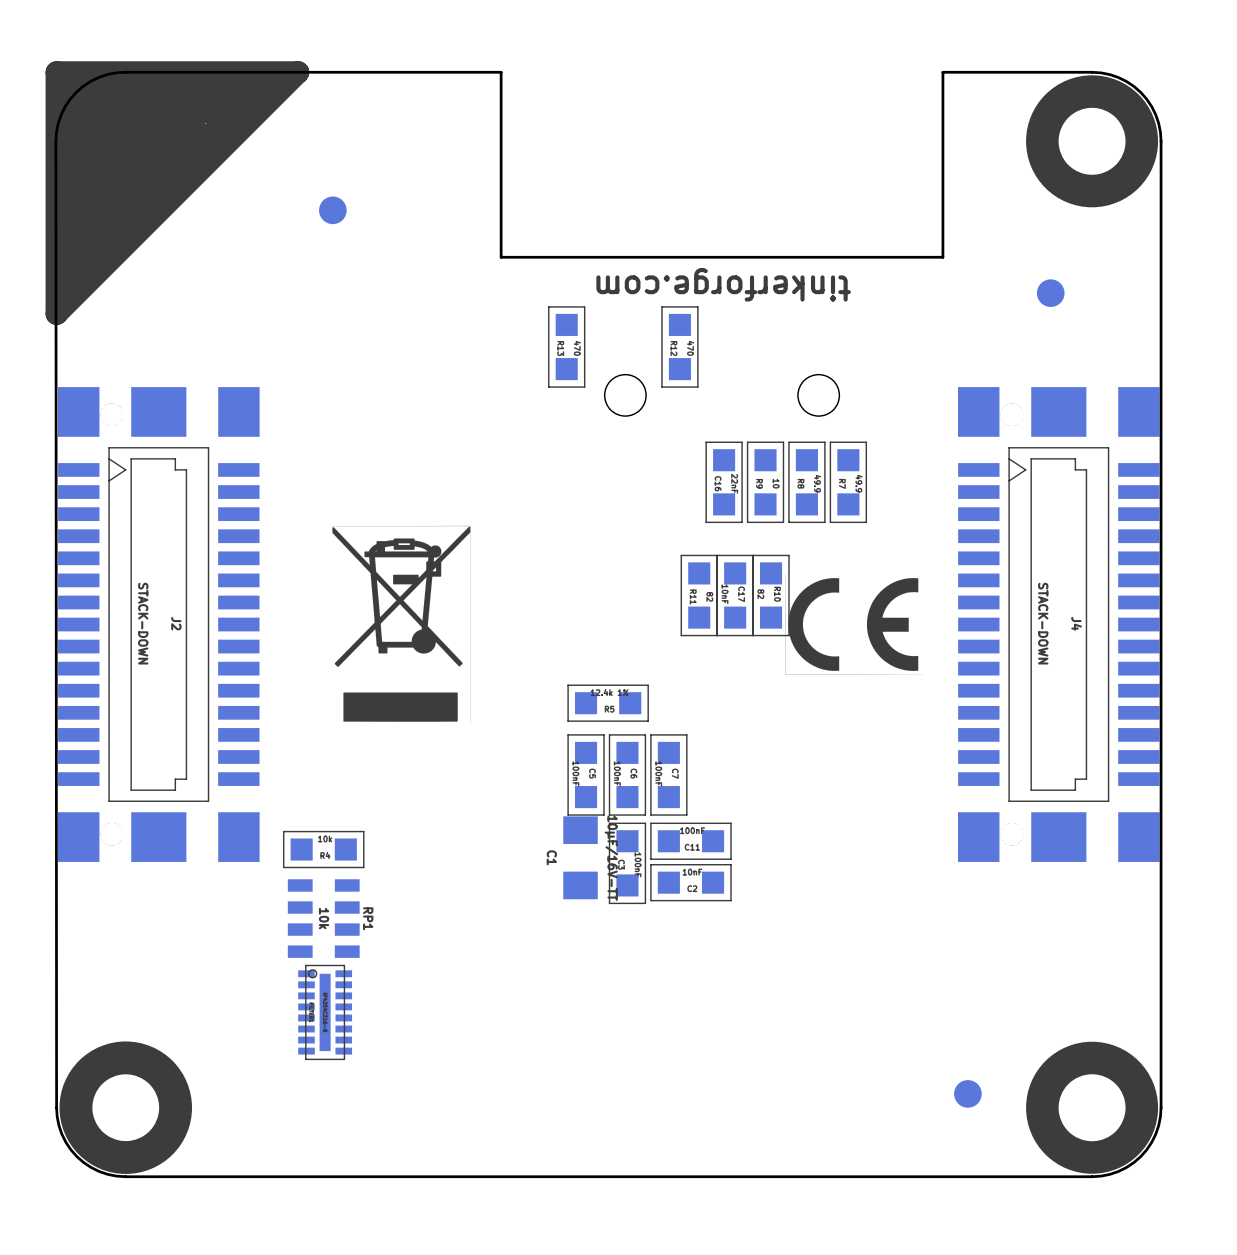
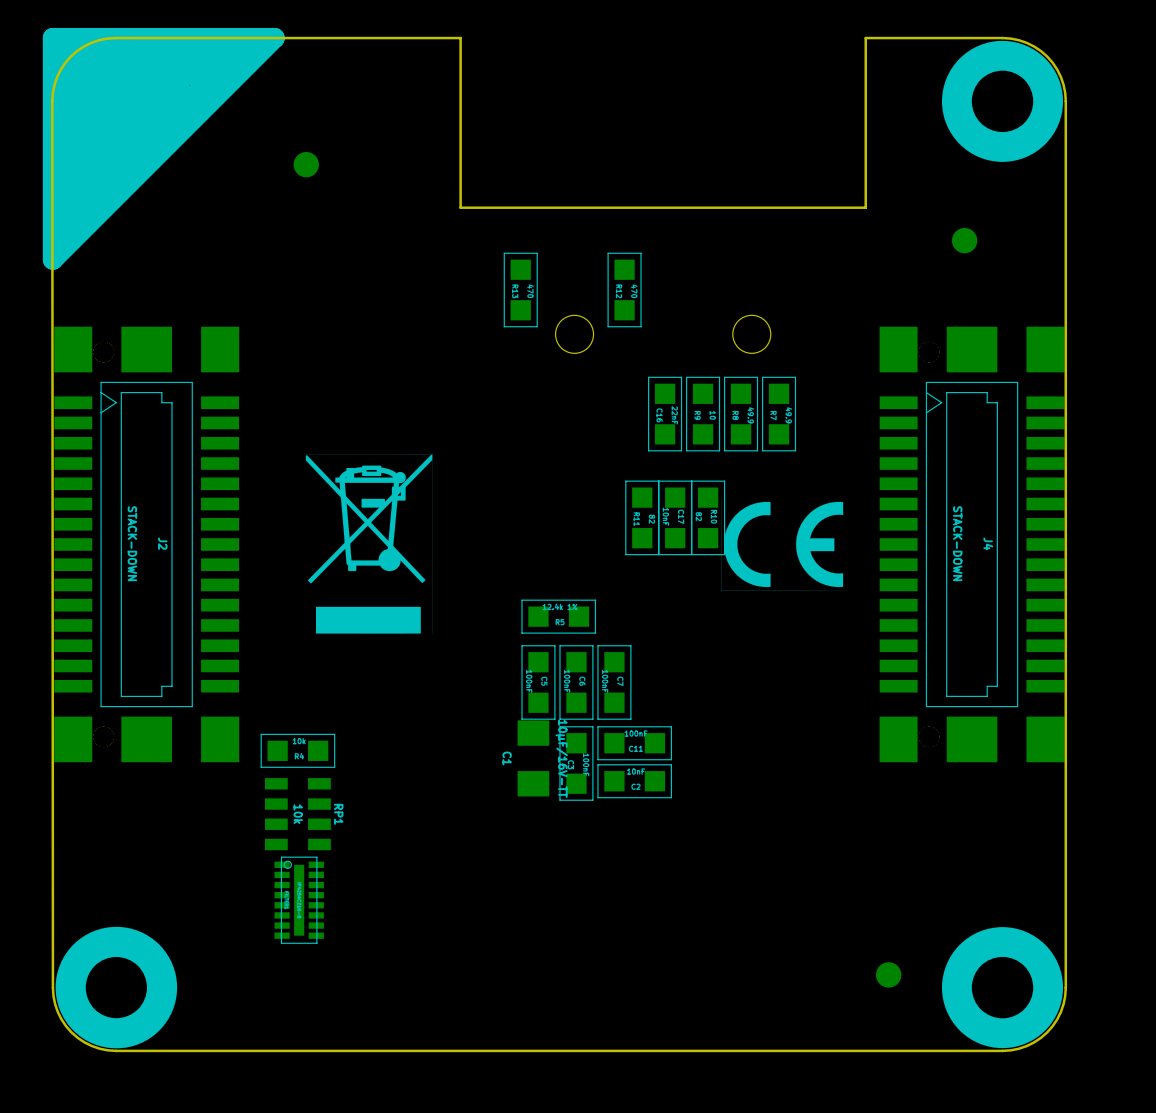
text: tinkerforge.com (723, 284) -> none

